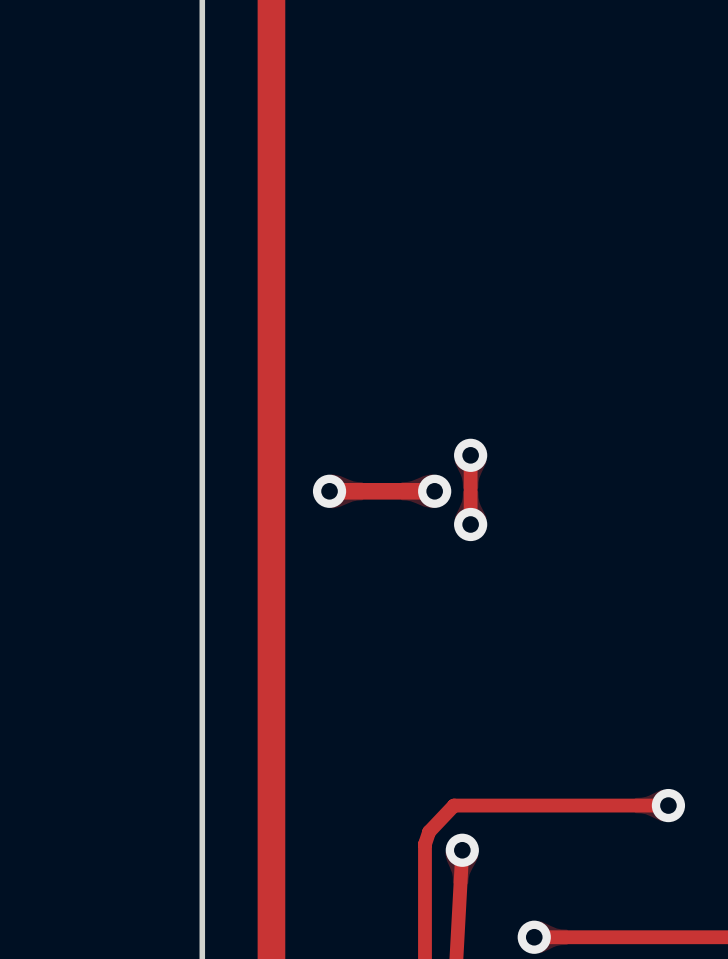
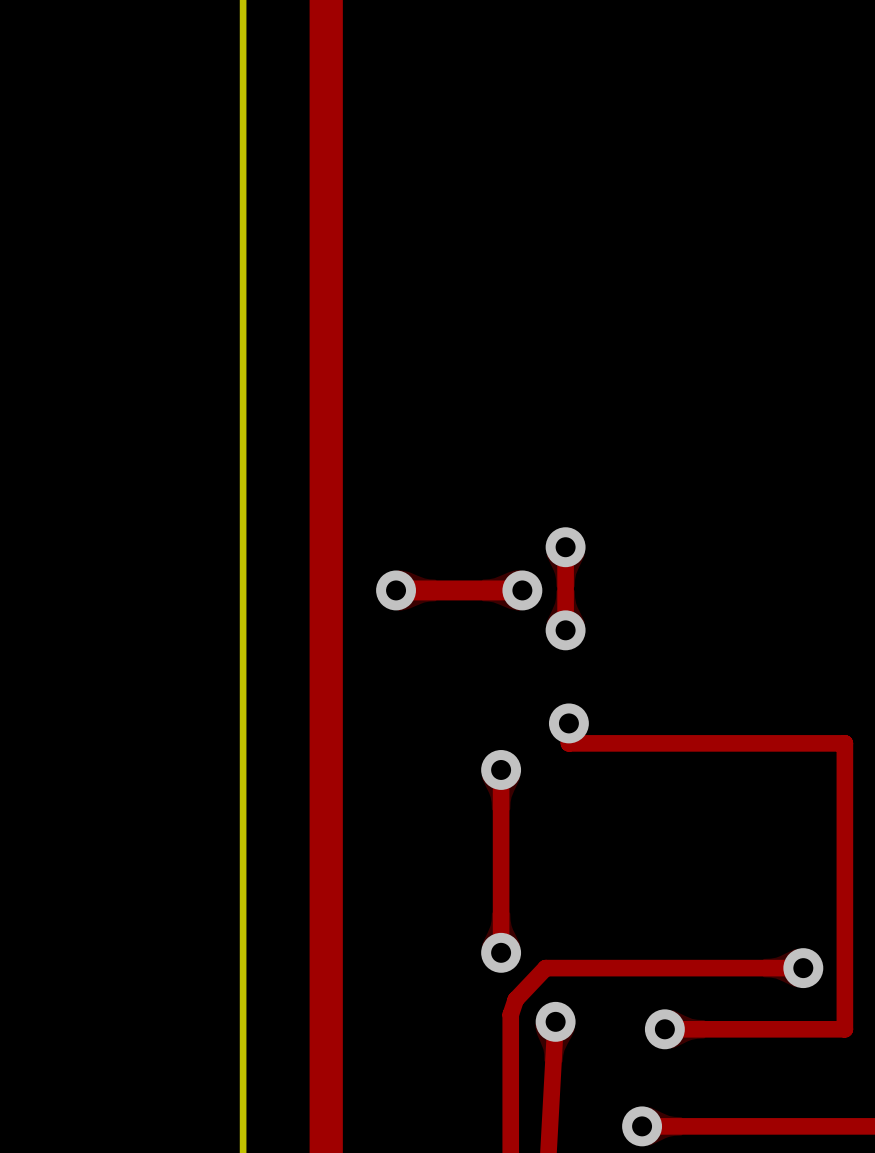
track: none -> (568, 723) (568, 743) (844, 743) (844, 1029) (664, 1029)
via: none -> (568, 723)
track: none -> (501, 769) (501, 952)
via: none -> (501, 769)
via: none -> (501, 952)
via: none -> (664, 1029)

